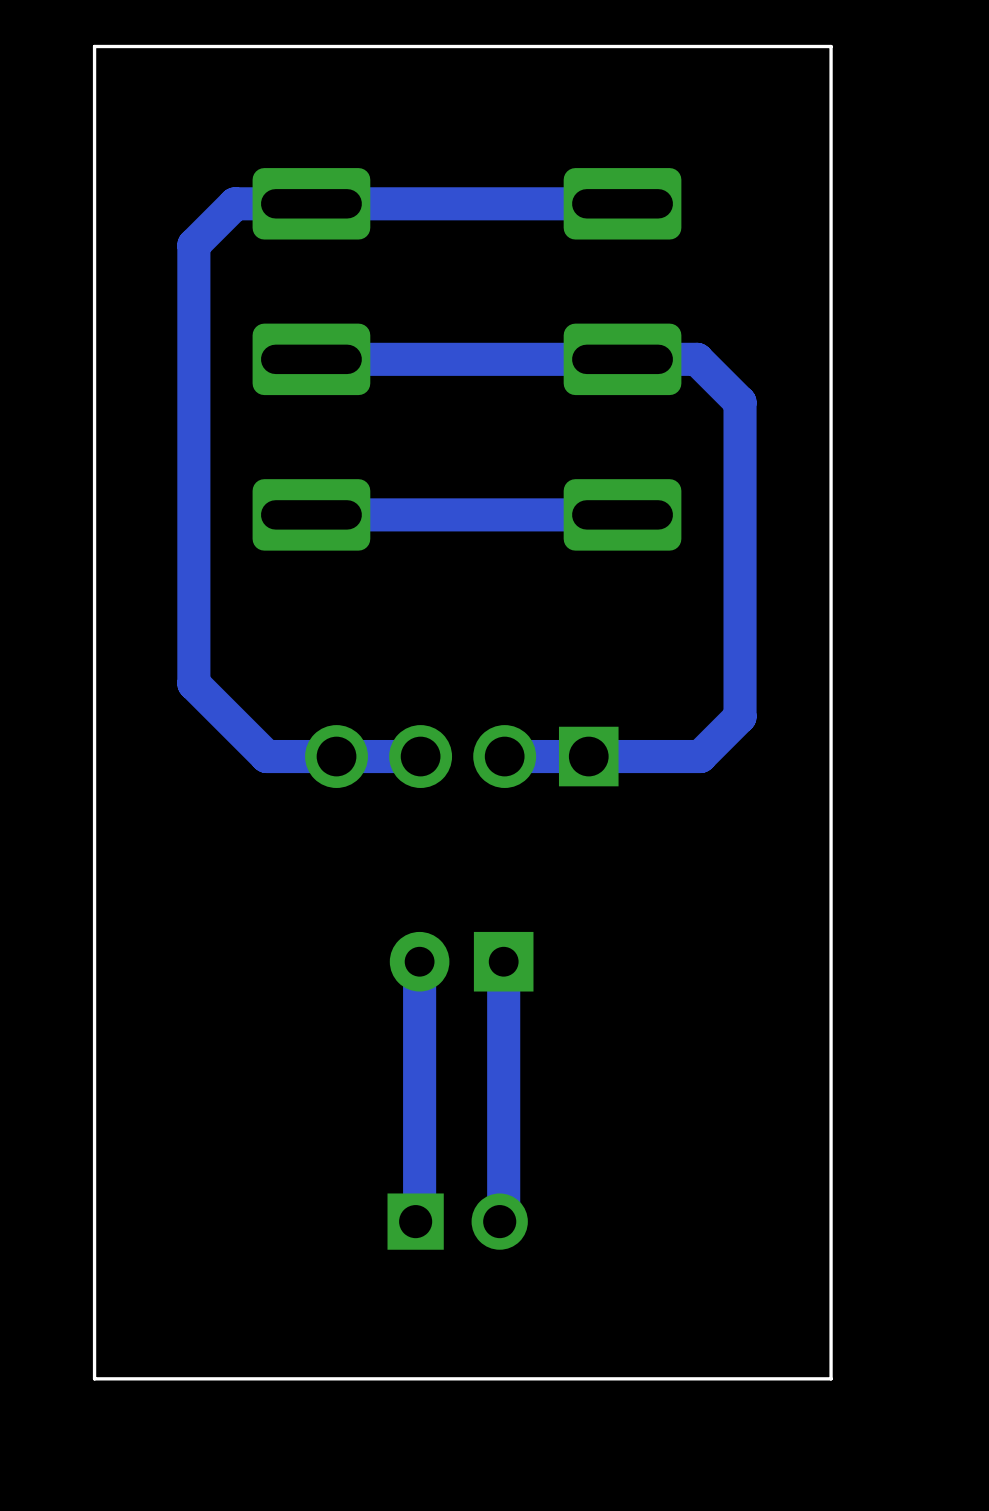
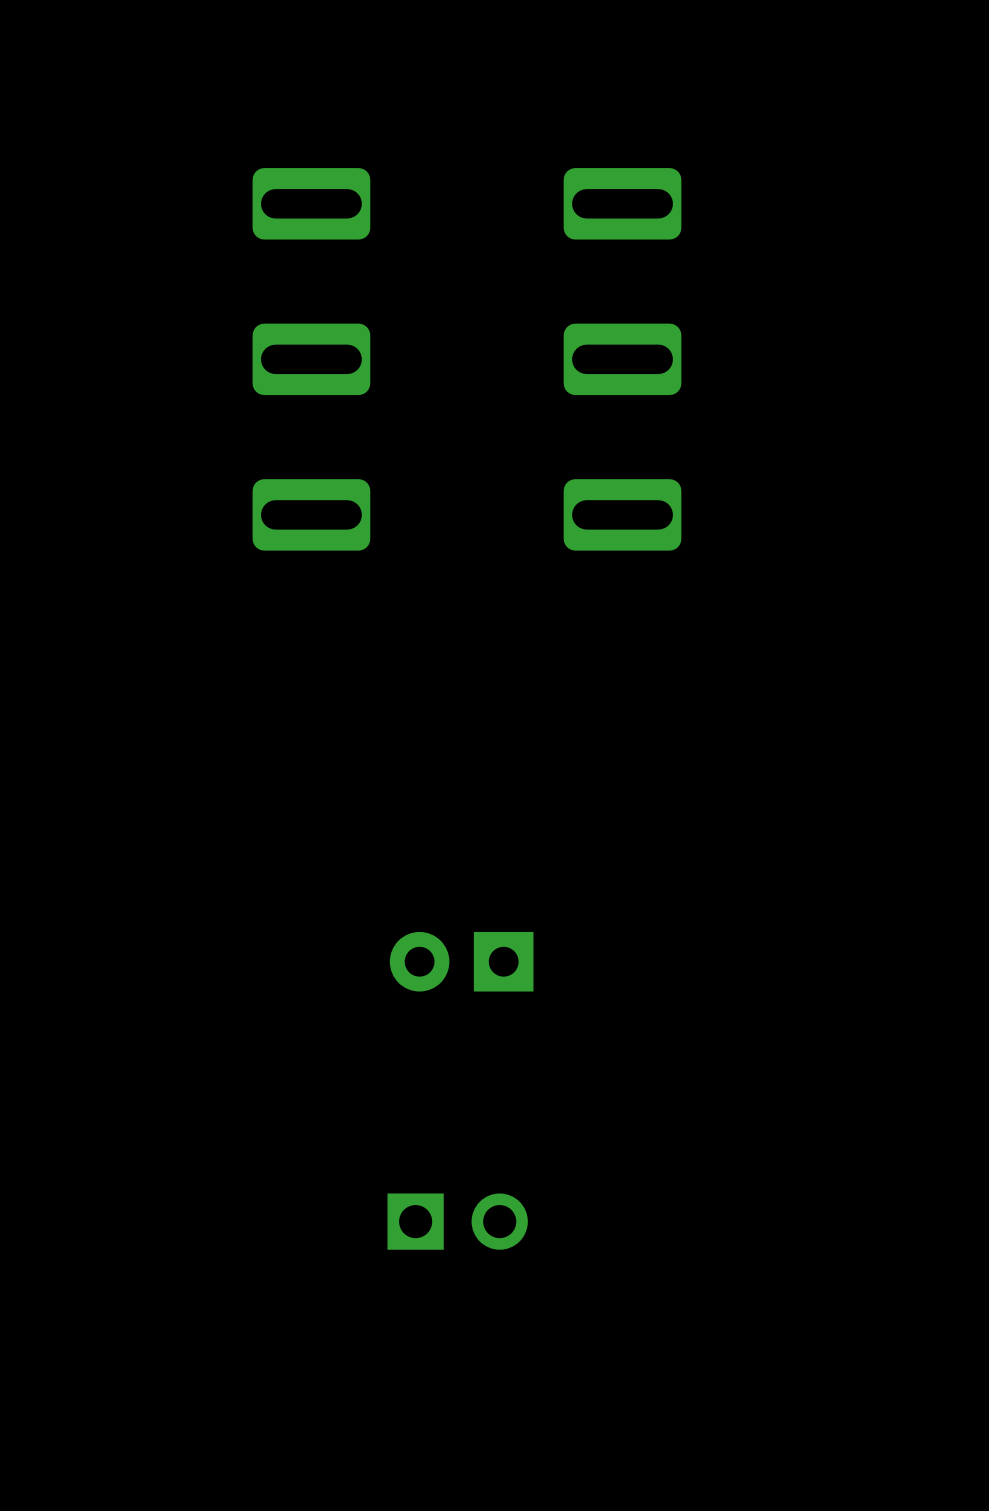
board edge: (831, 46) (94, 46) (94, 1378) (831, 1378) (831, 46) -> none
track: (622, 203) (235, 203) (193, 245) (193, 683) (266, 756) (420, 756) -> none
track: (311, 359) (697, 359) (740, 402) (740, 716) (700, 756) (504, 756) -> none
track: (622, 514) (311, 514) -> none
part: (461, 756) -> none
track: (419, 961) (419, 1217) (415, 1221) -> none
track: (503, 961) (503, 1217) (499, 1221) -> none

